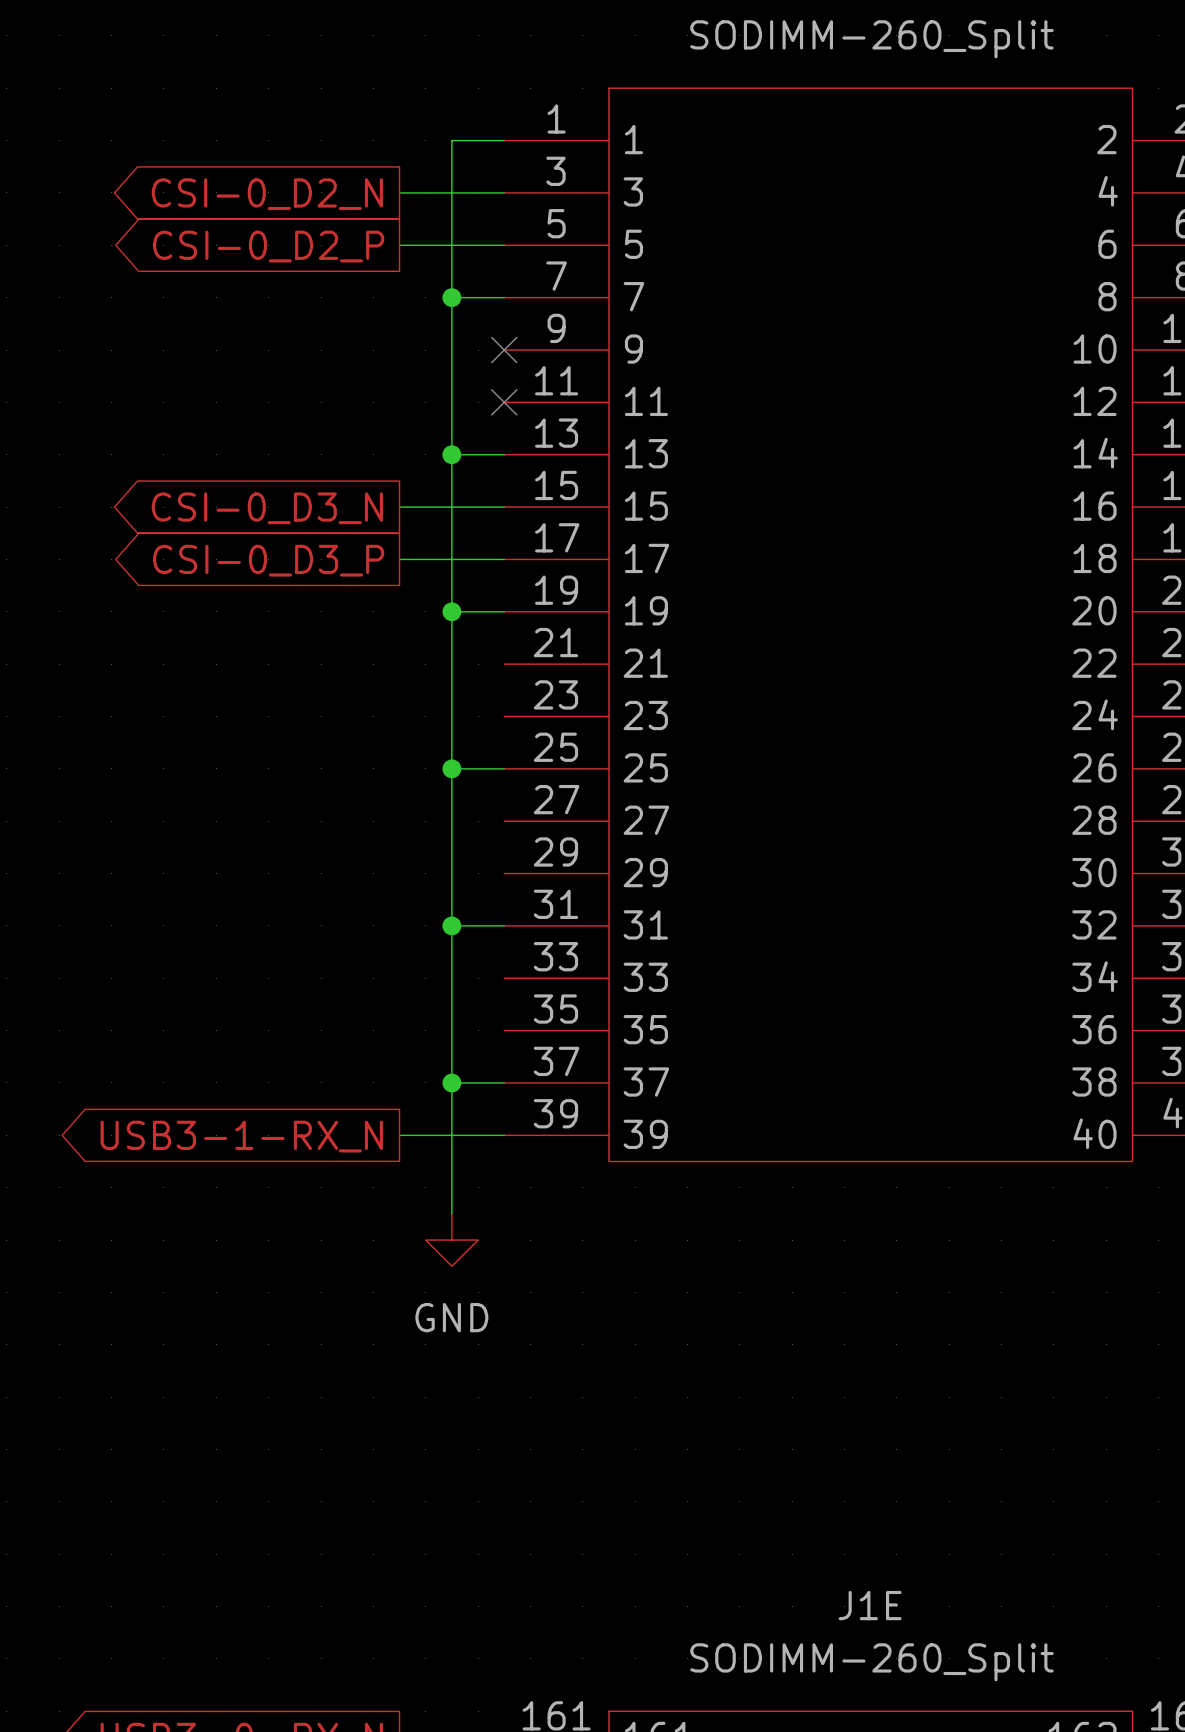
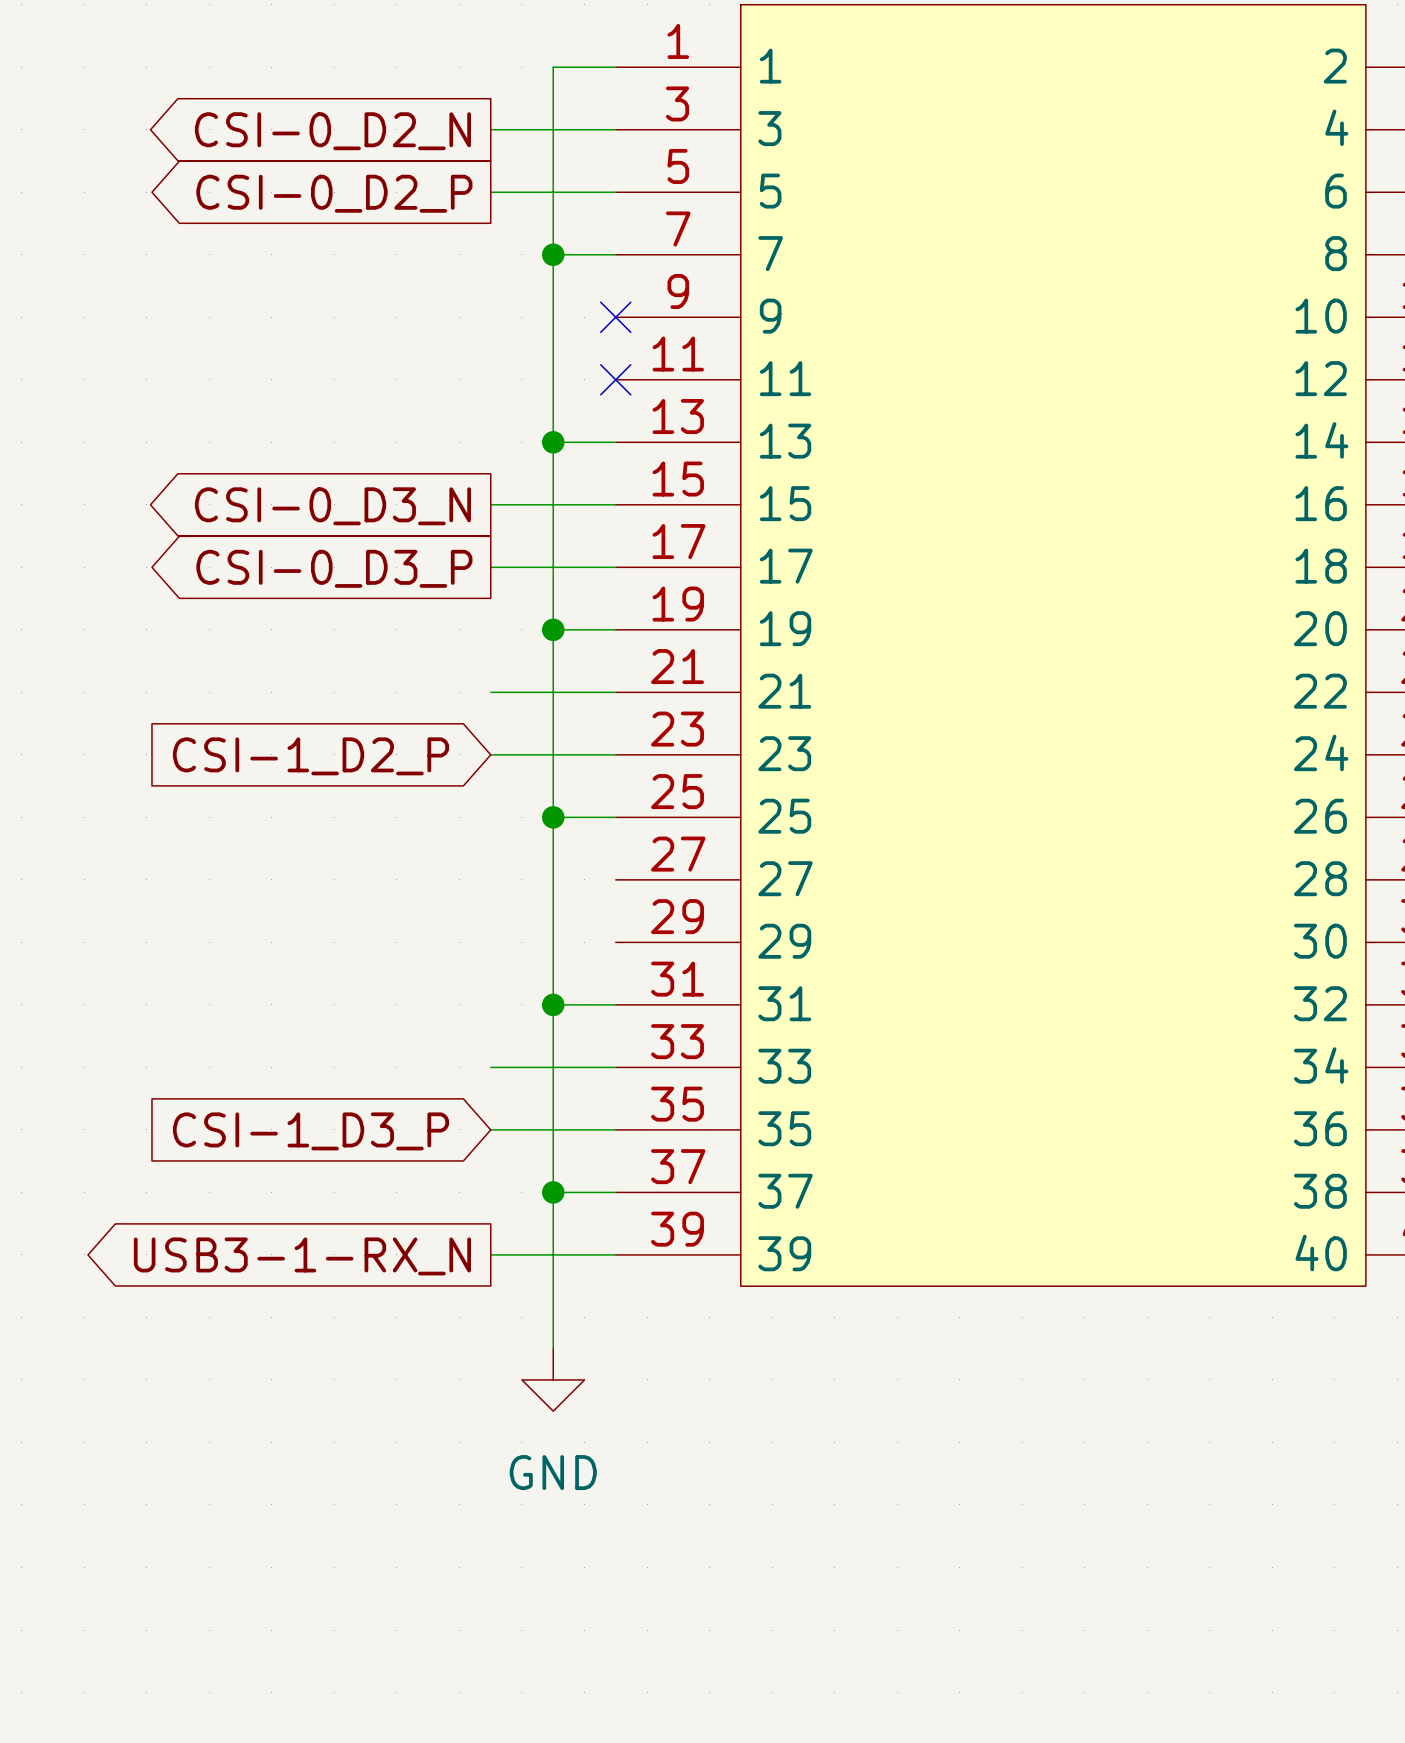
wire: none -> (490, 692) (615, 692)
wire: none -> (490, 754) (615, 754)
global label: none -> CSI-1_D2_P (310, 756)
wire: none -> (490, 1067) (615, 1067)
wire: none -> (490, 1129) (615, 1129)
global label: none -> CSI-1_D3_P (310, 1131)

